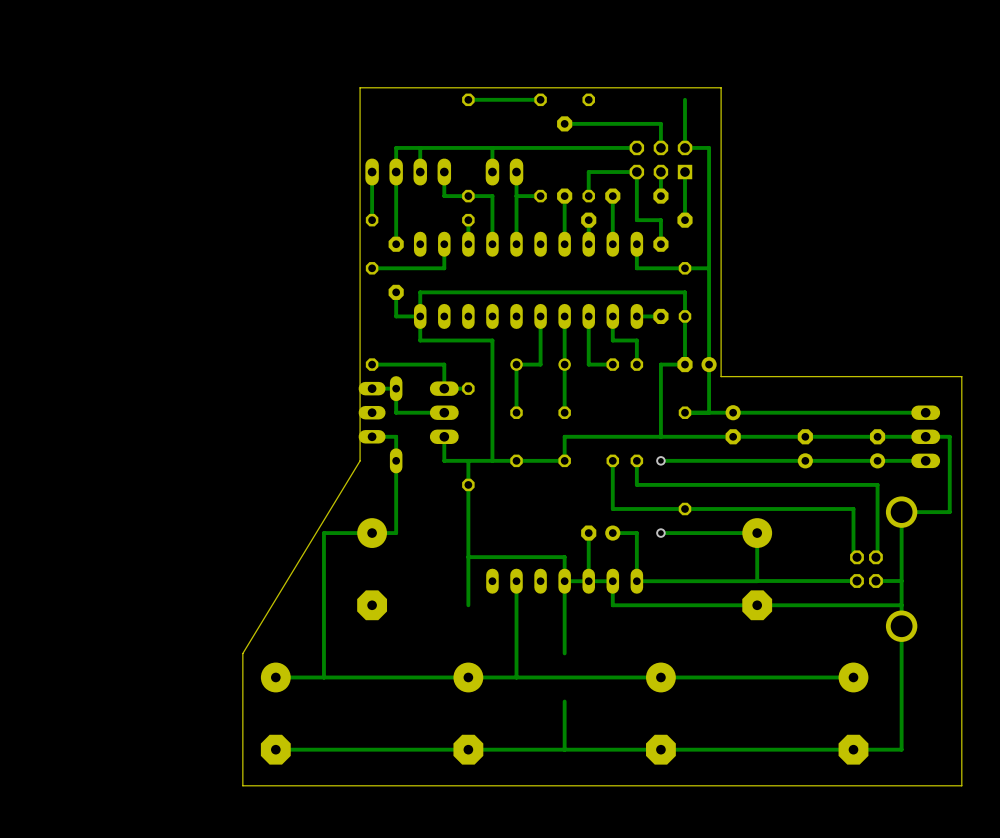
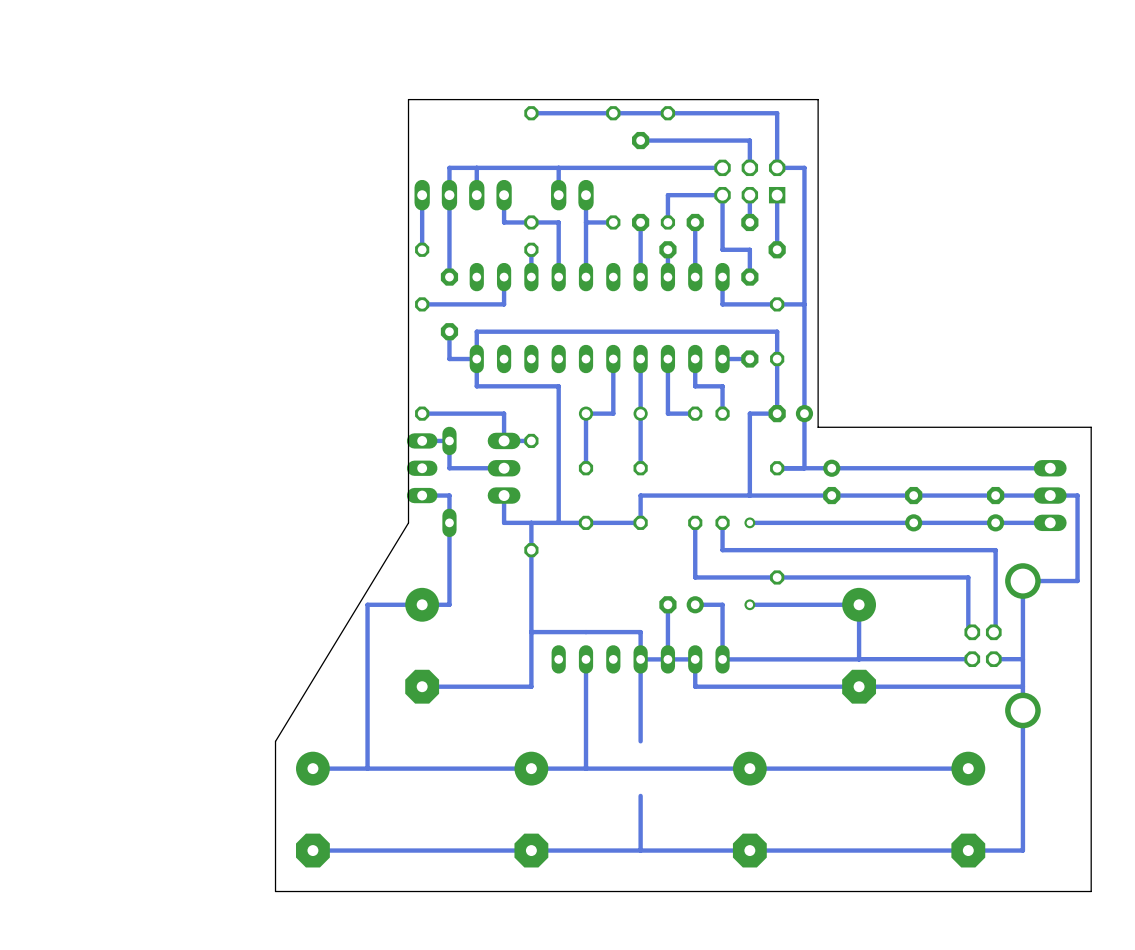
track: none -> (777, 113) (613, 113)
track: none -> (531, 686) (422, 686)

